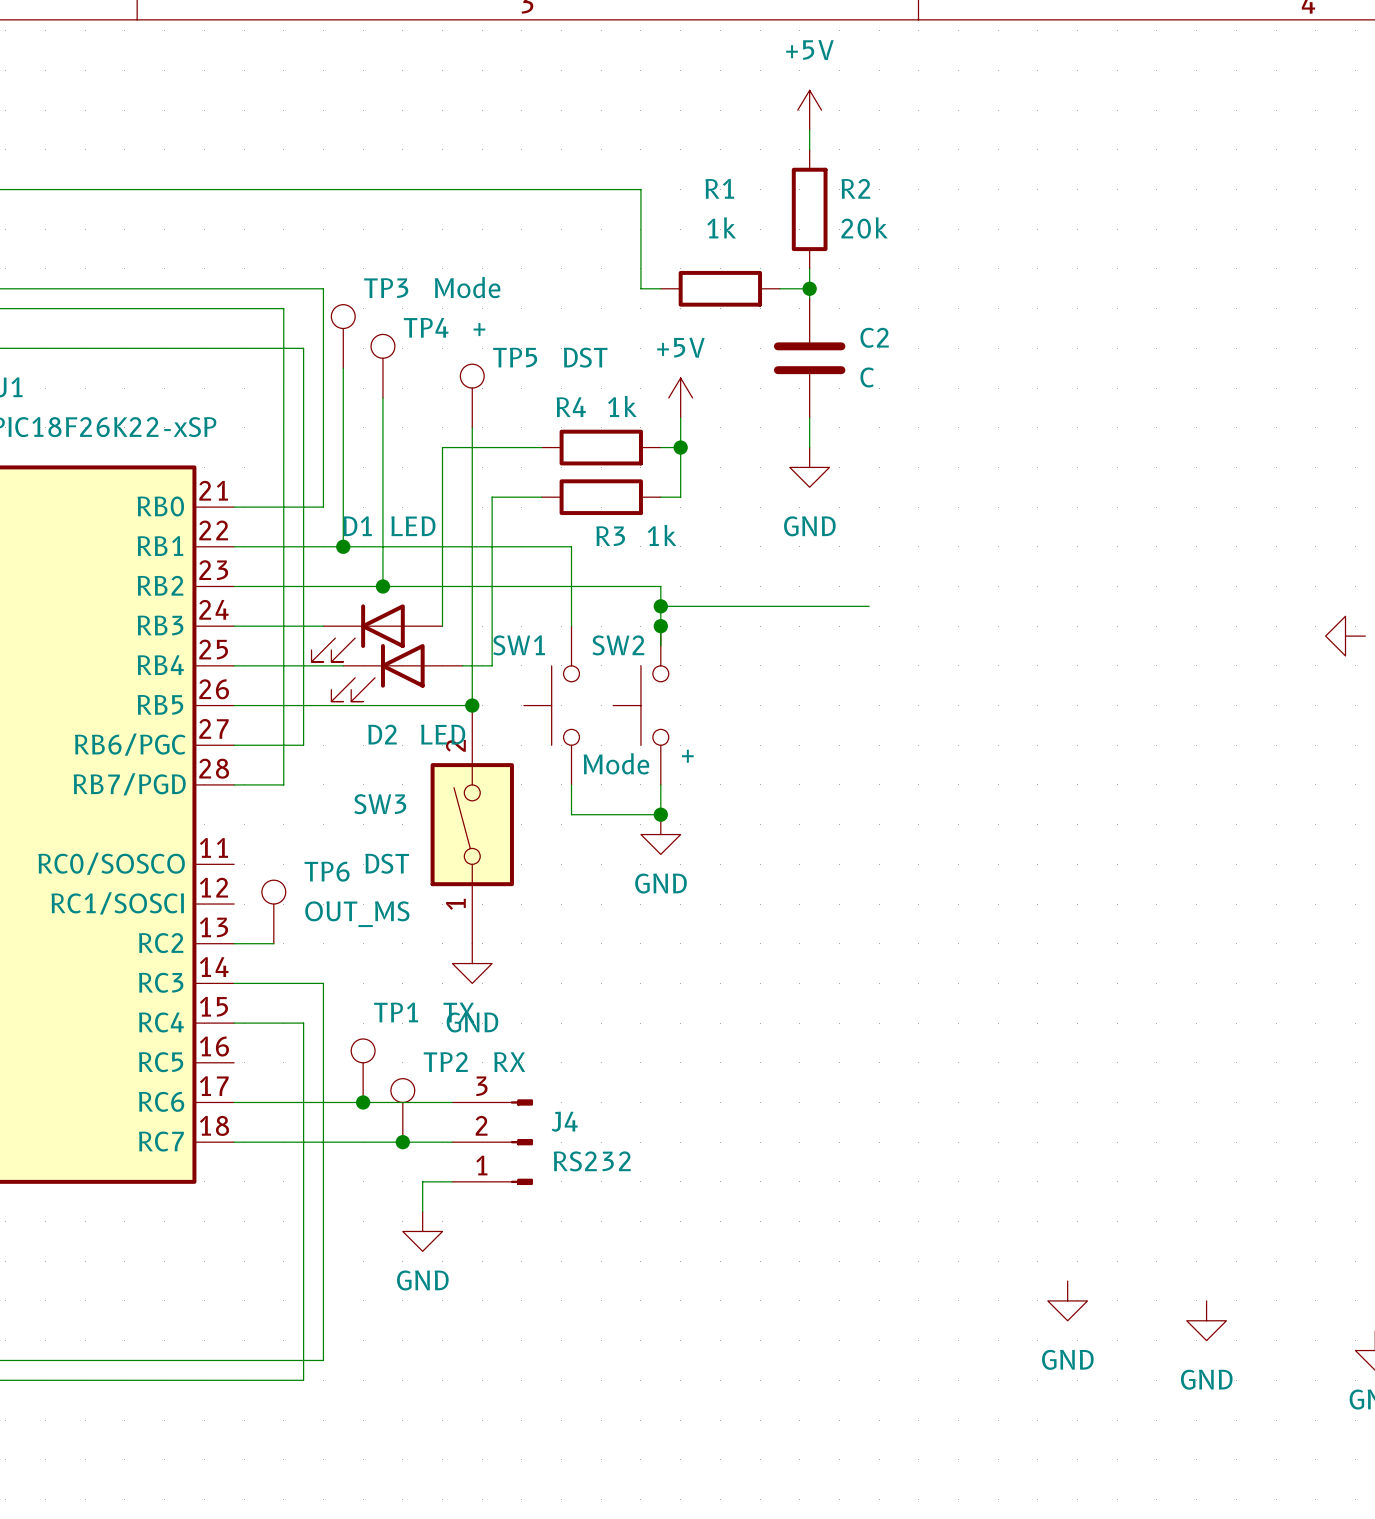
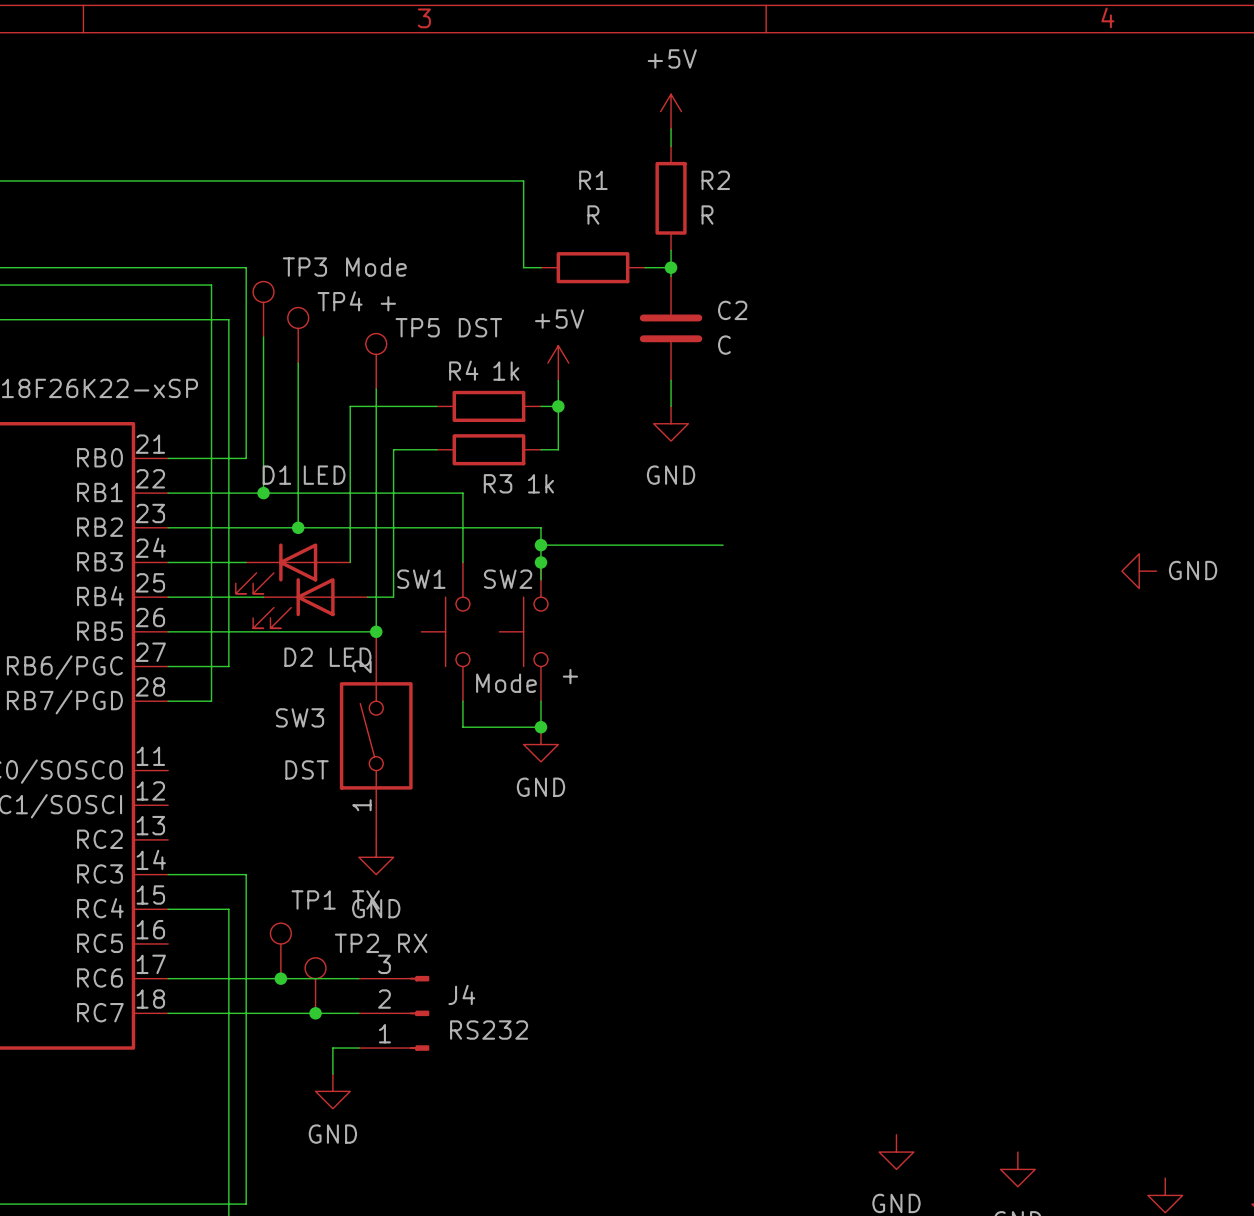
R1 value: 1k (721, 227) -> R (593, 215)
R2 value: 20k (864, 227) -> R (707, 215)
TP6: OUT_MS (273, 911) -> none
wire: (234, 943) (273, 943) -> none

